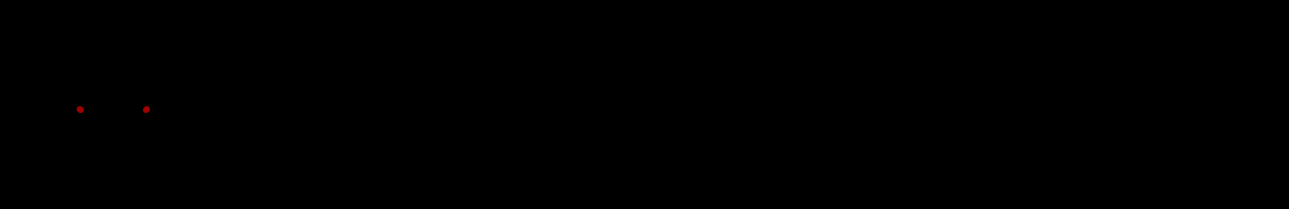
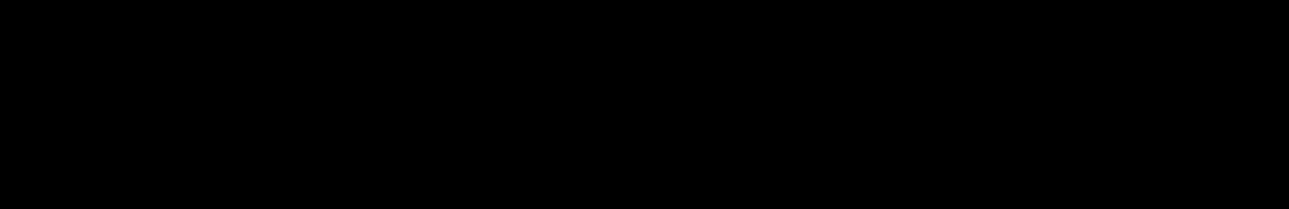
track: (79, 109) (80, 109) -> none
track: (146, 109) (146, 109) -> none

